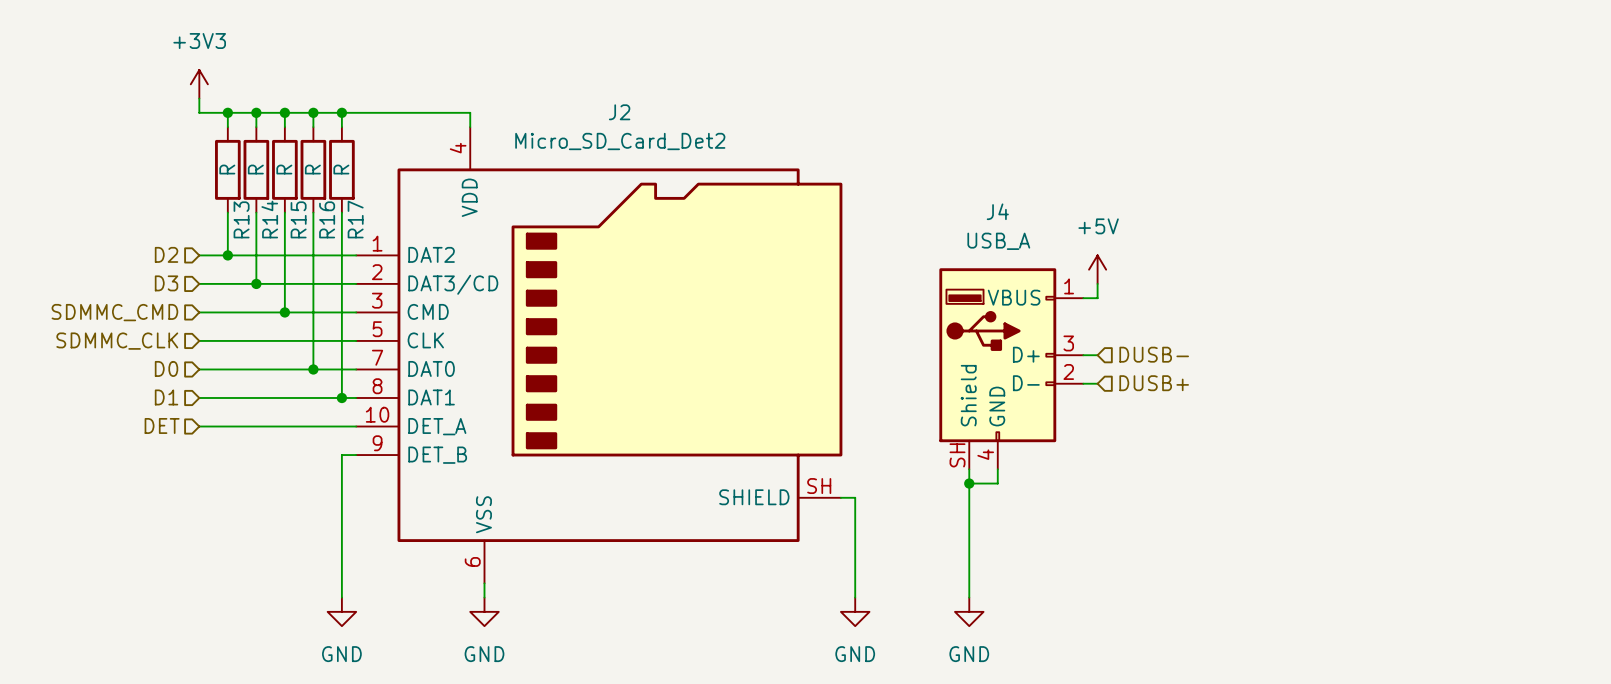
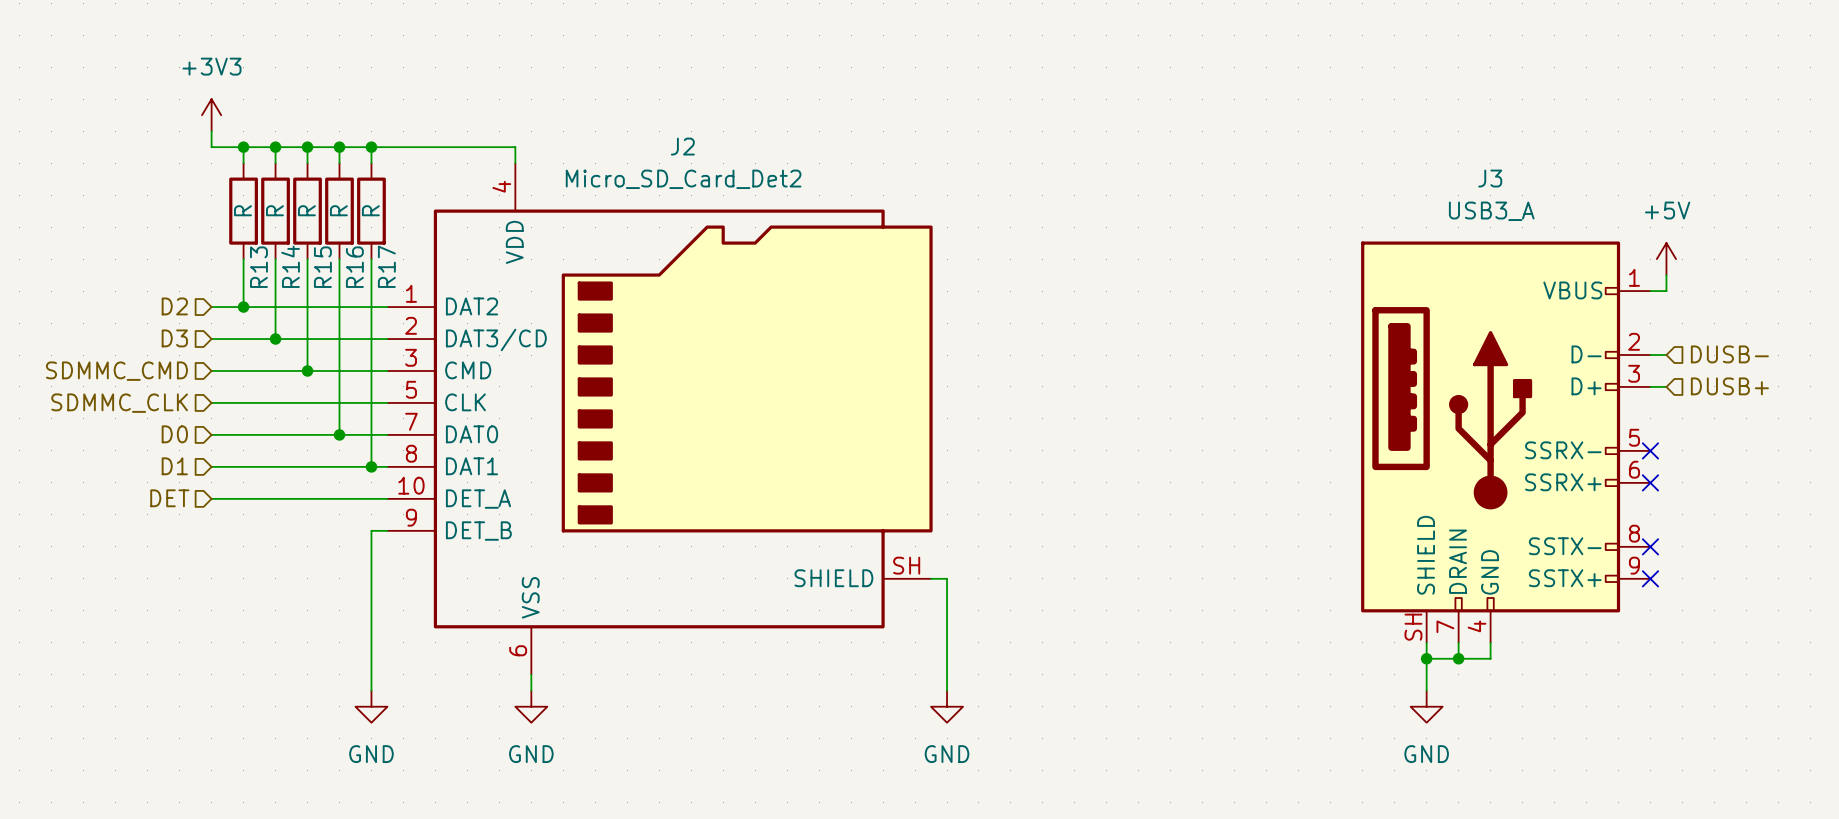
power symbol: none -> +5V (1666, 259)
wire: none -> (1666, 275) (1666, 291) (1650, 291)
power symbol: +5V (1097, 269) -> none
wire: (1097, 283) (1097, 298) (1083, 298) -> none
hierarchical label: none -> DUSB- (1729, 354)
wire: none -> (1650, 355) (1666, 355)
wire: none -> (1650, 386) (1666, 386)
hierarchical label: none -> DUSB+ (1729, 386)
hierarchical label: DUSB- (1154, 354) -> none
wire: (1083, 355) (1097, 355) -> none
J4: USB_A (1011, 368) -> none
J3: none -> USB3_A (1505, 442)
wire: (1083, 383) (1097, 383) -> none
hierarchical label: DUSB+ (1154, 383) -> none
no-connect mark: none -> (1650, 450)
no-connect mark: none -> (1650, 482)
wire: (969, 469) (969, 597) -> none
wire: (997, 469) (997, 483) (969, 483) -> none
no-connect mark: none -> (1650, 546)
junction: (969, 483) -> none
no-connect mark: none -> (1650, 578)
wire: none -> (1426, 642) (1426, 690)
wire: none -> (1458, 642) (1458, 658)
wire: none -> (1490, 642) (1490, 658) (1426, 658)
junction: none -> (1426, 658)
junction: none -> (1458, 658)
power symbol: GND (969, 611) -> none
power symbol: none -> GND (1426, 706)

